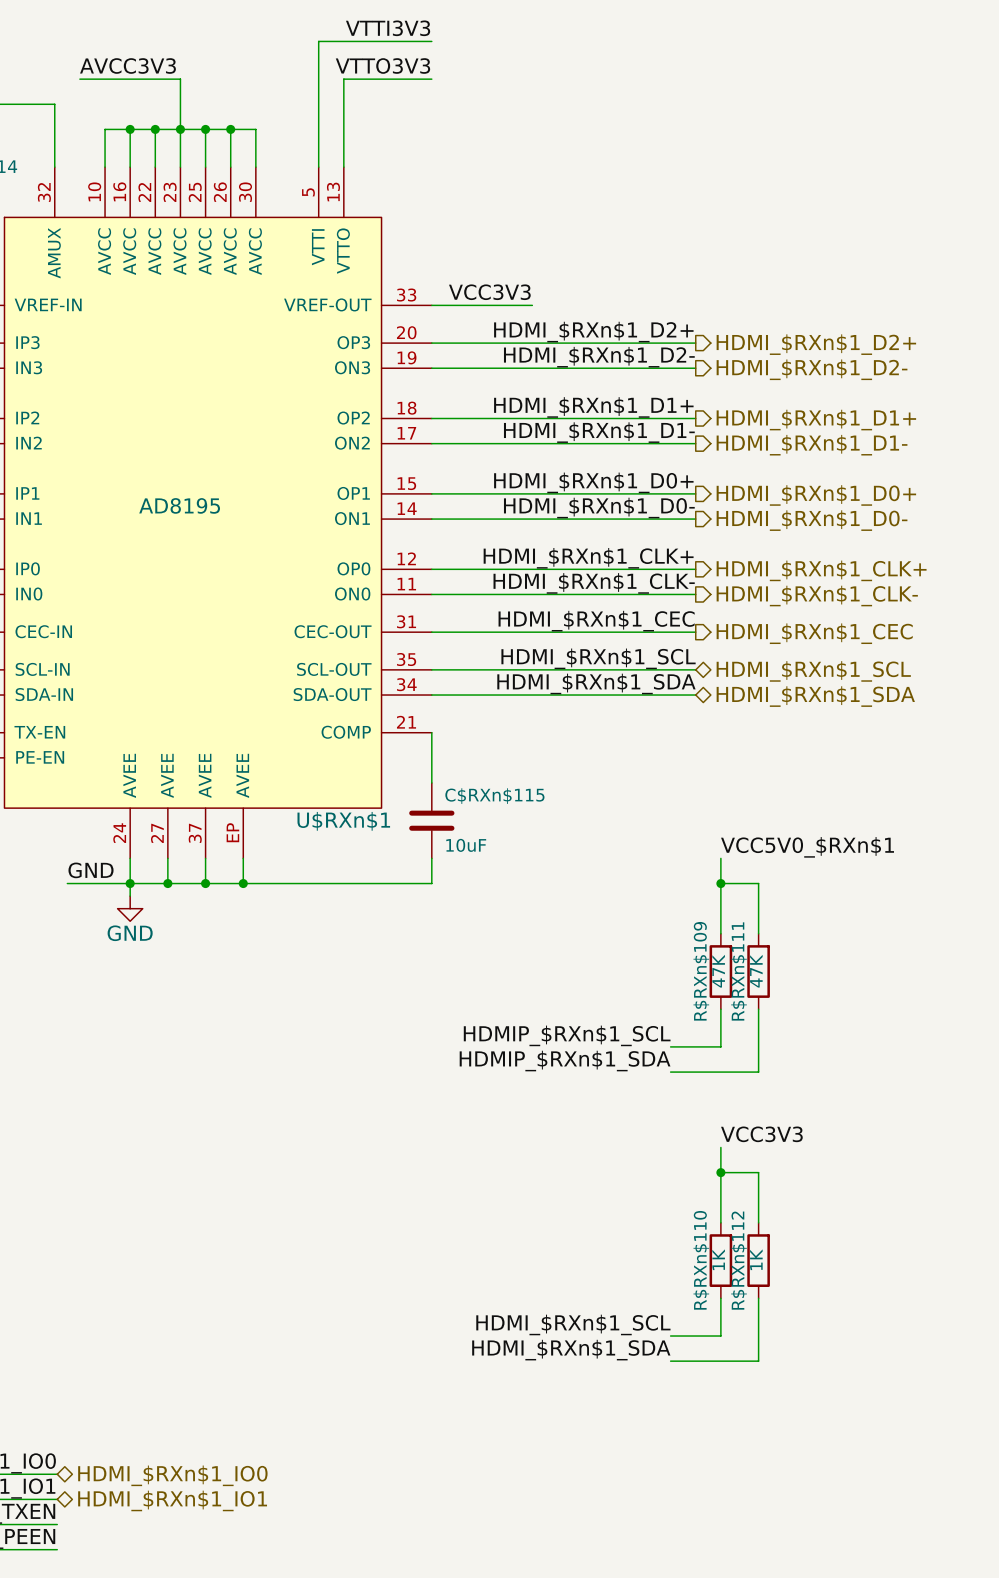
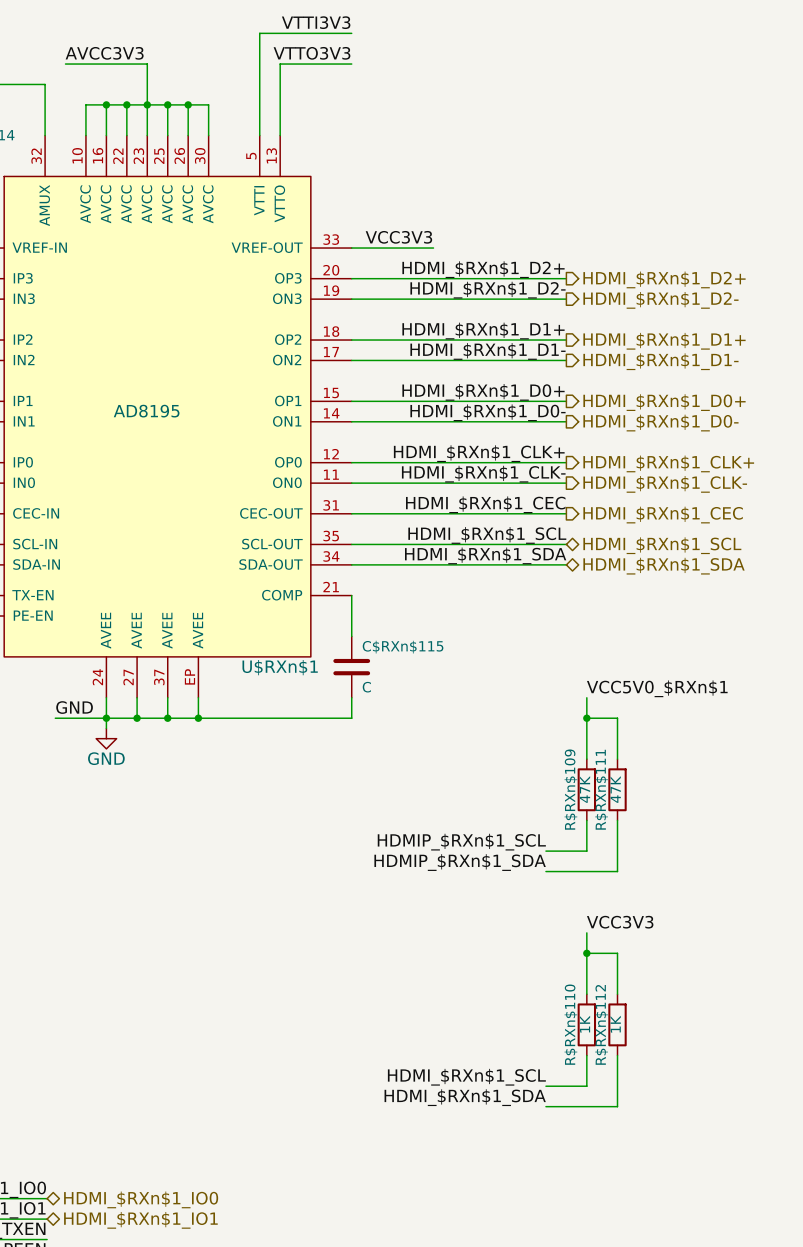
C$RXn$115 value: 10uF (466, 845) -> C (366, 687)

